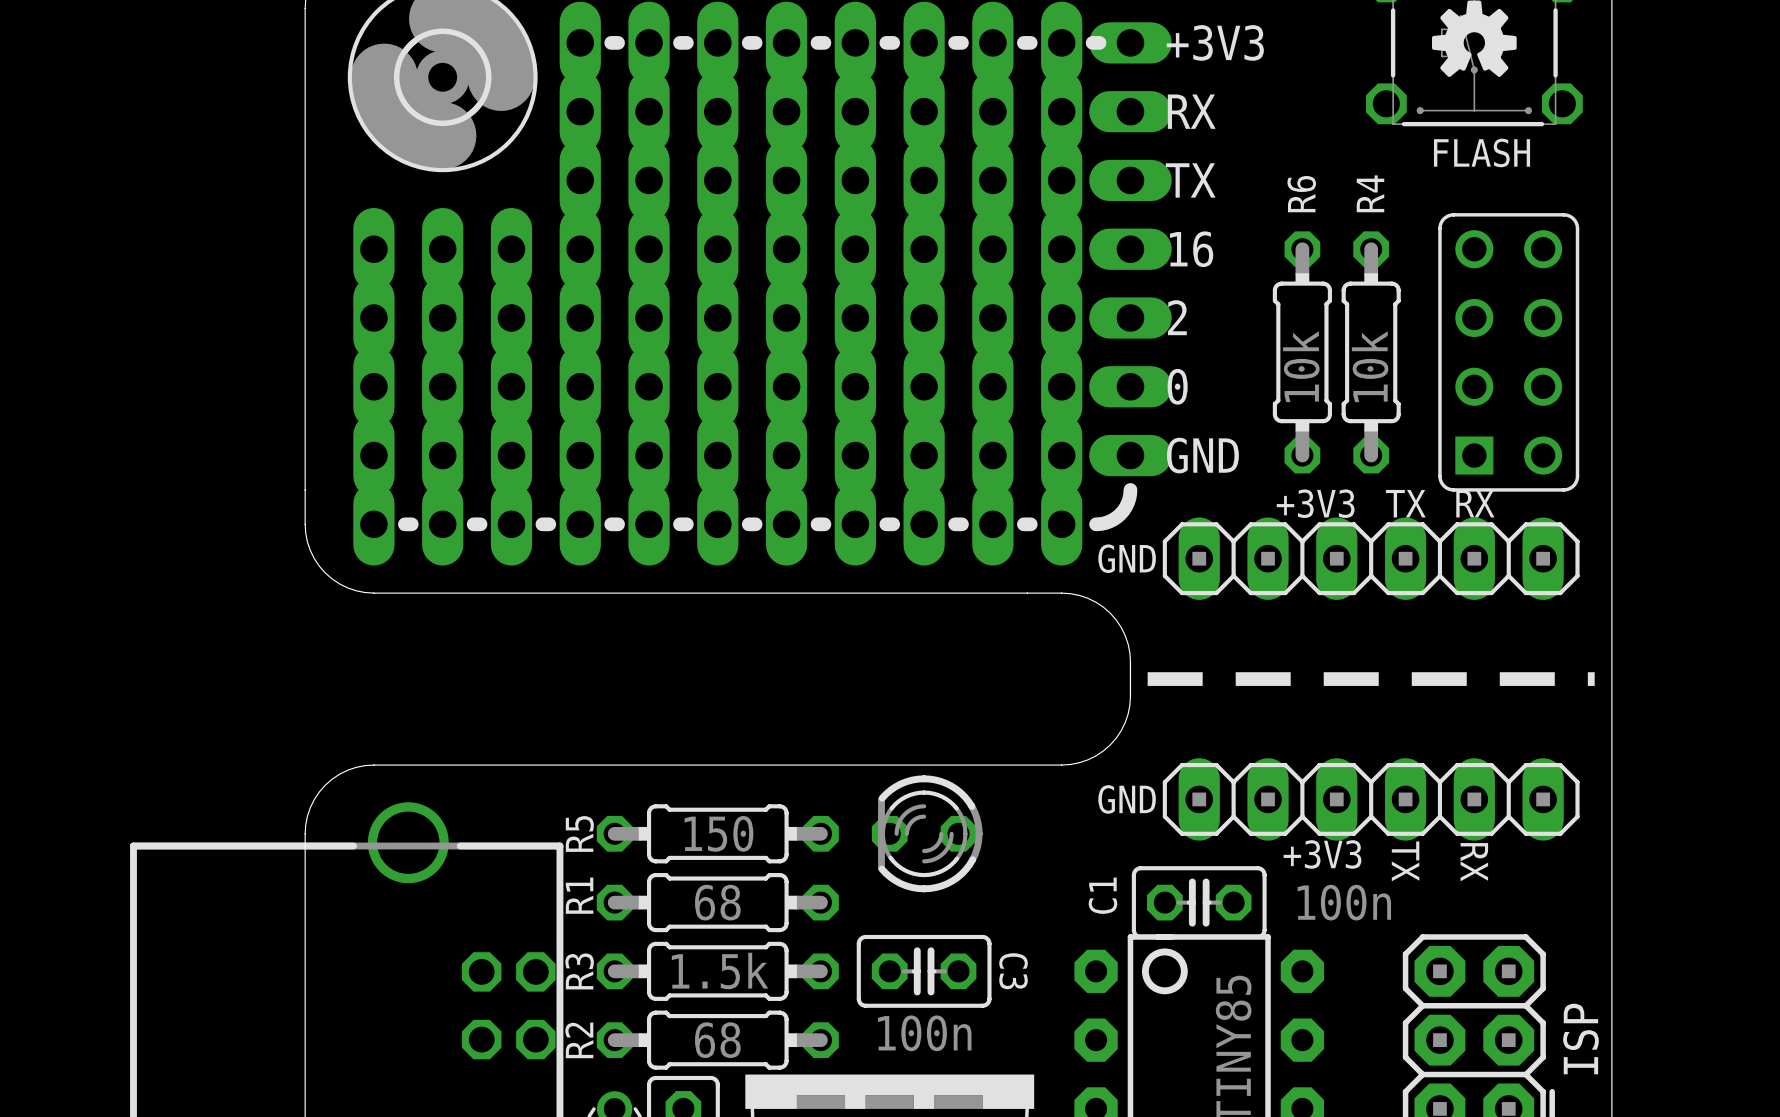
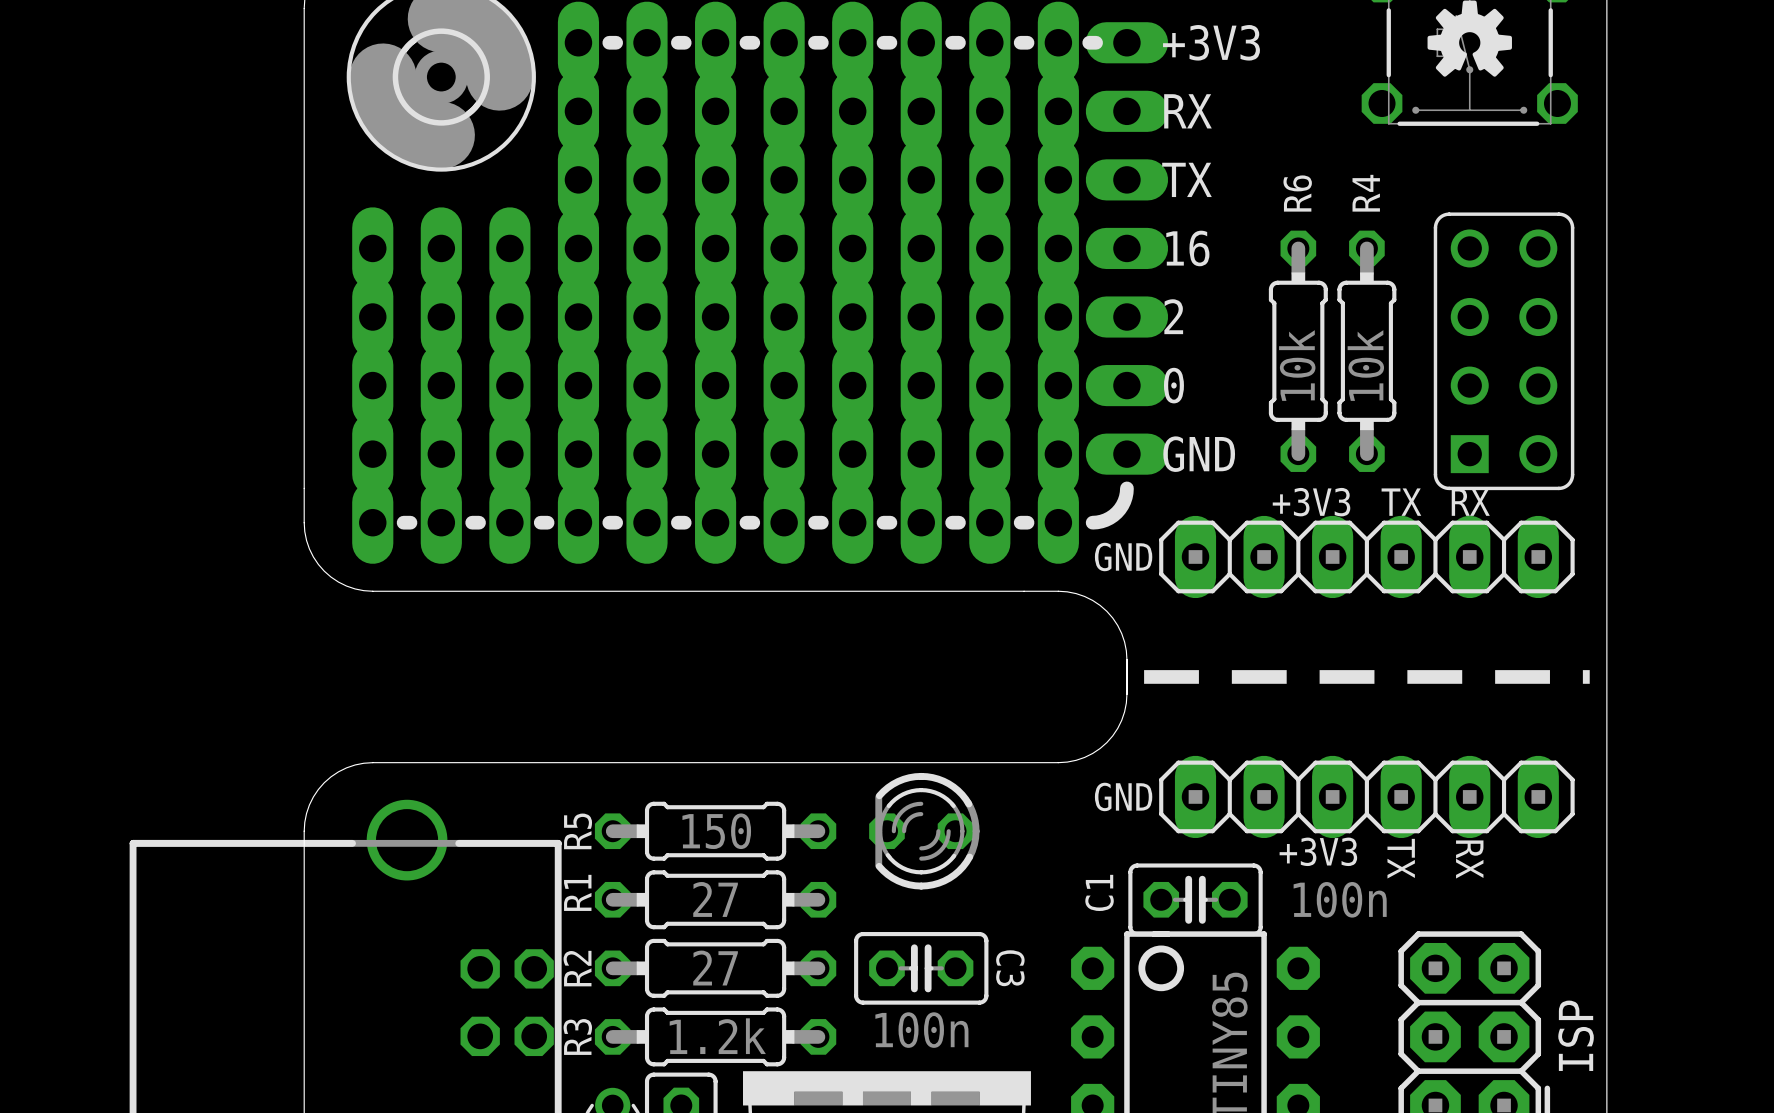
text: FLASH (1482, 152) -> none
R1 value: 68 (717, 902) -> 27 (715, 899)
R3 value: 1.5k (720, 970) -> 27 (715, 968)
R3 name: R3 (579, 971) -> R2 (577, 968)
R2 name: R2 (579, 1040) -> R3 (577, 1037)
R2 value: 68 (717, 1040) -> 1.2k (717, 1036)

